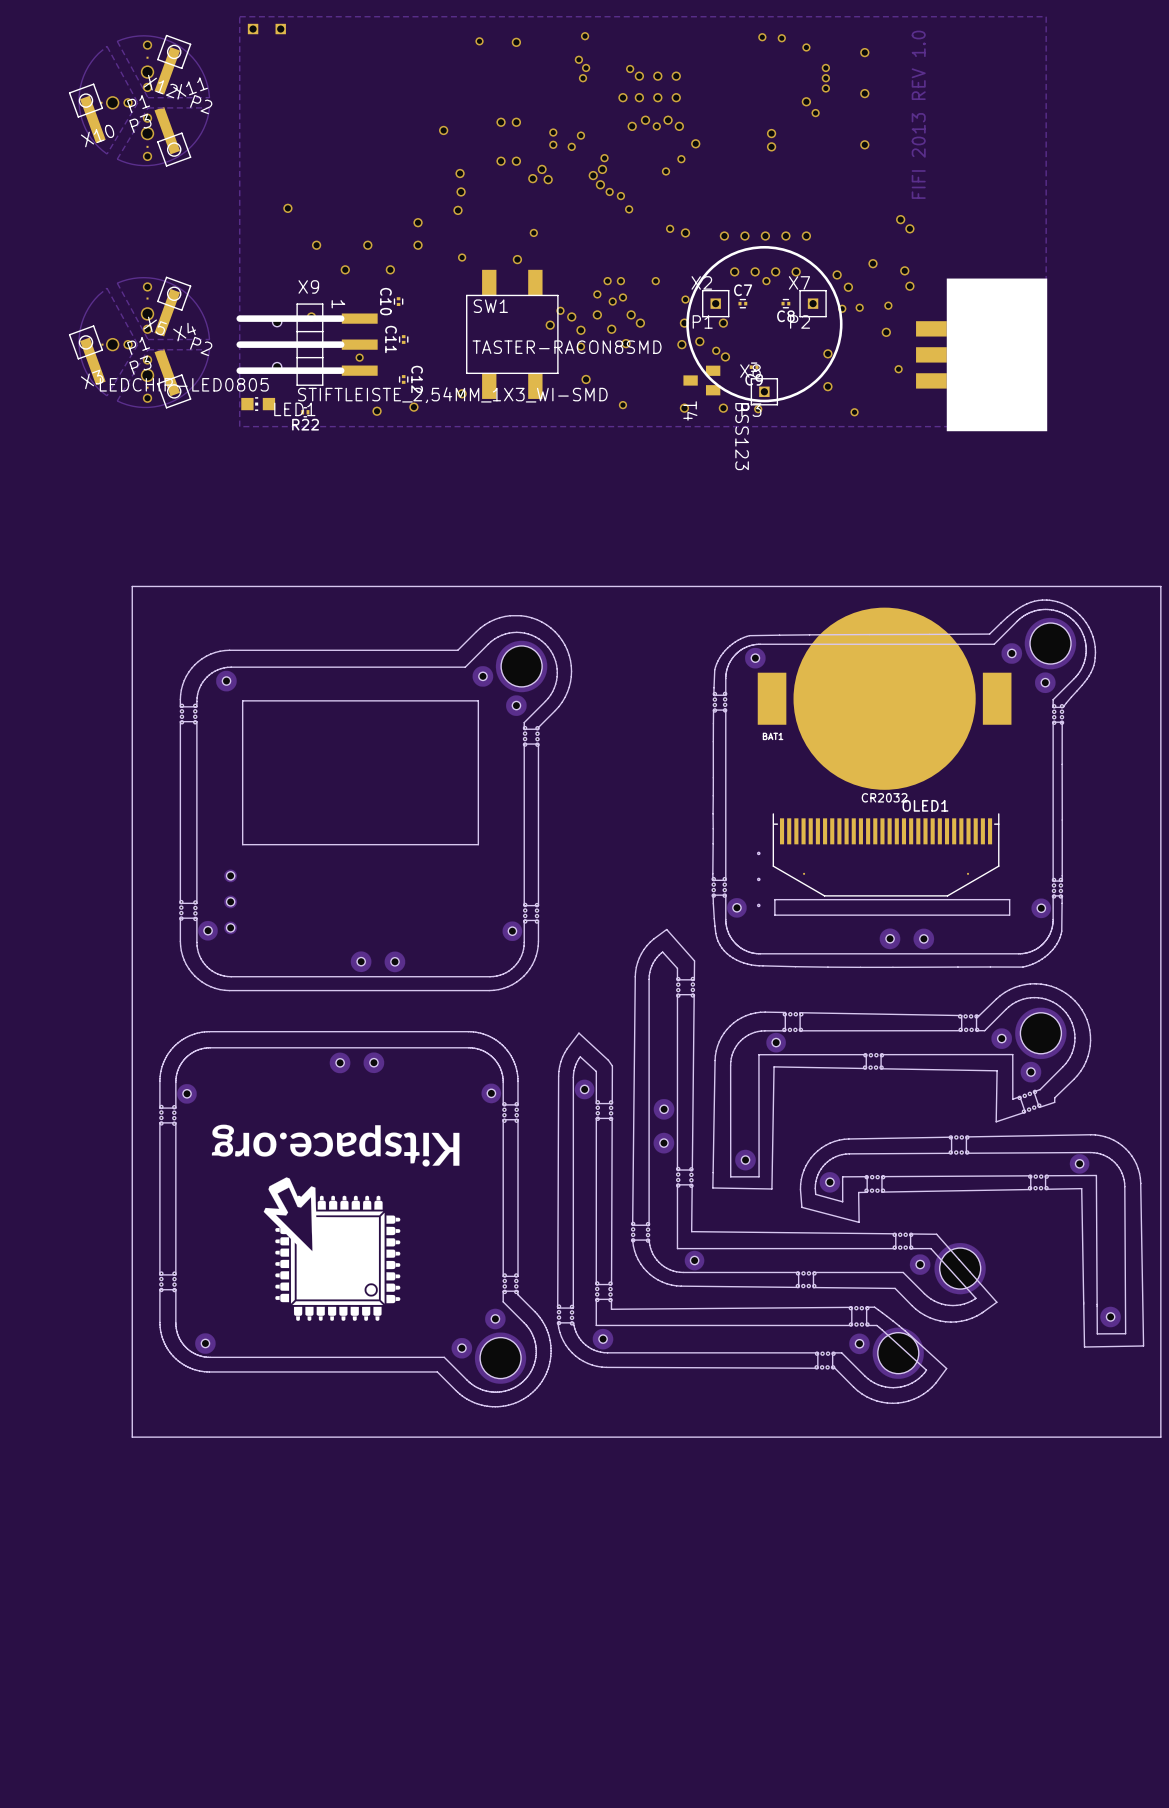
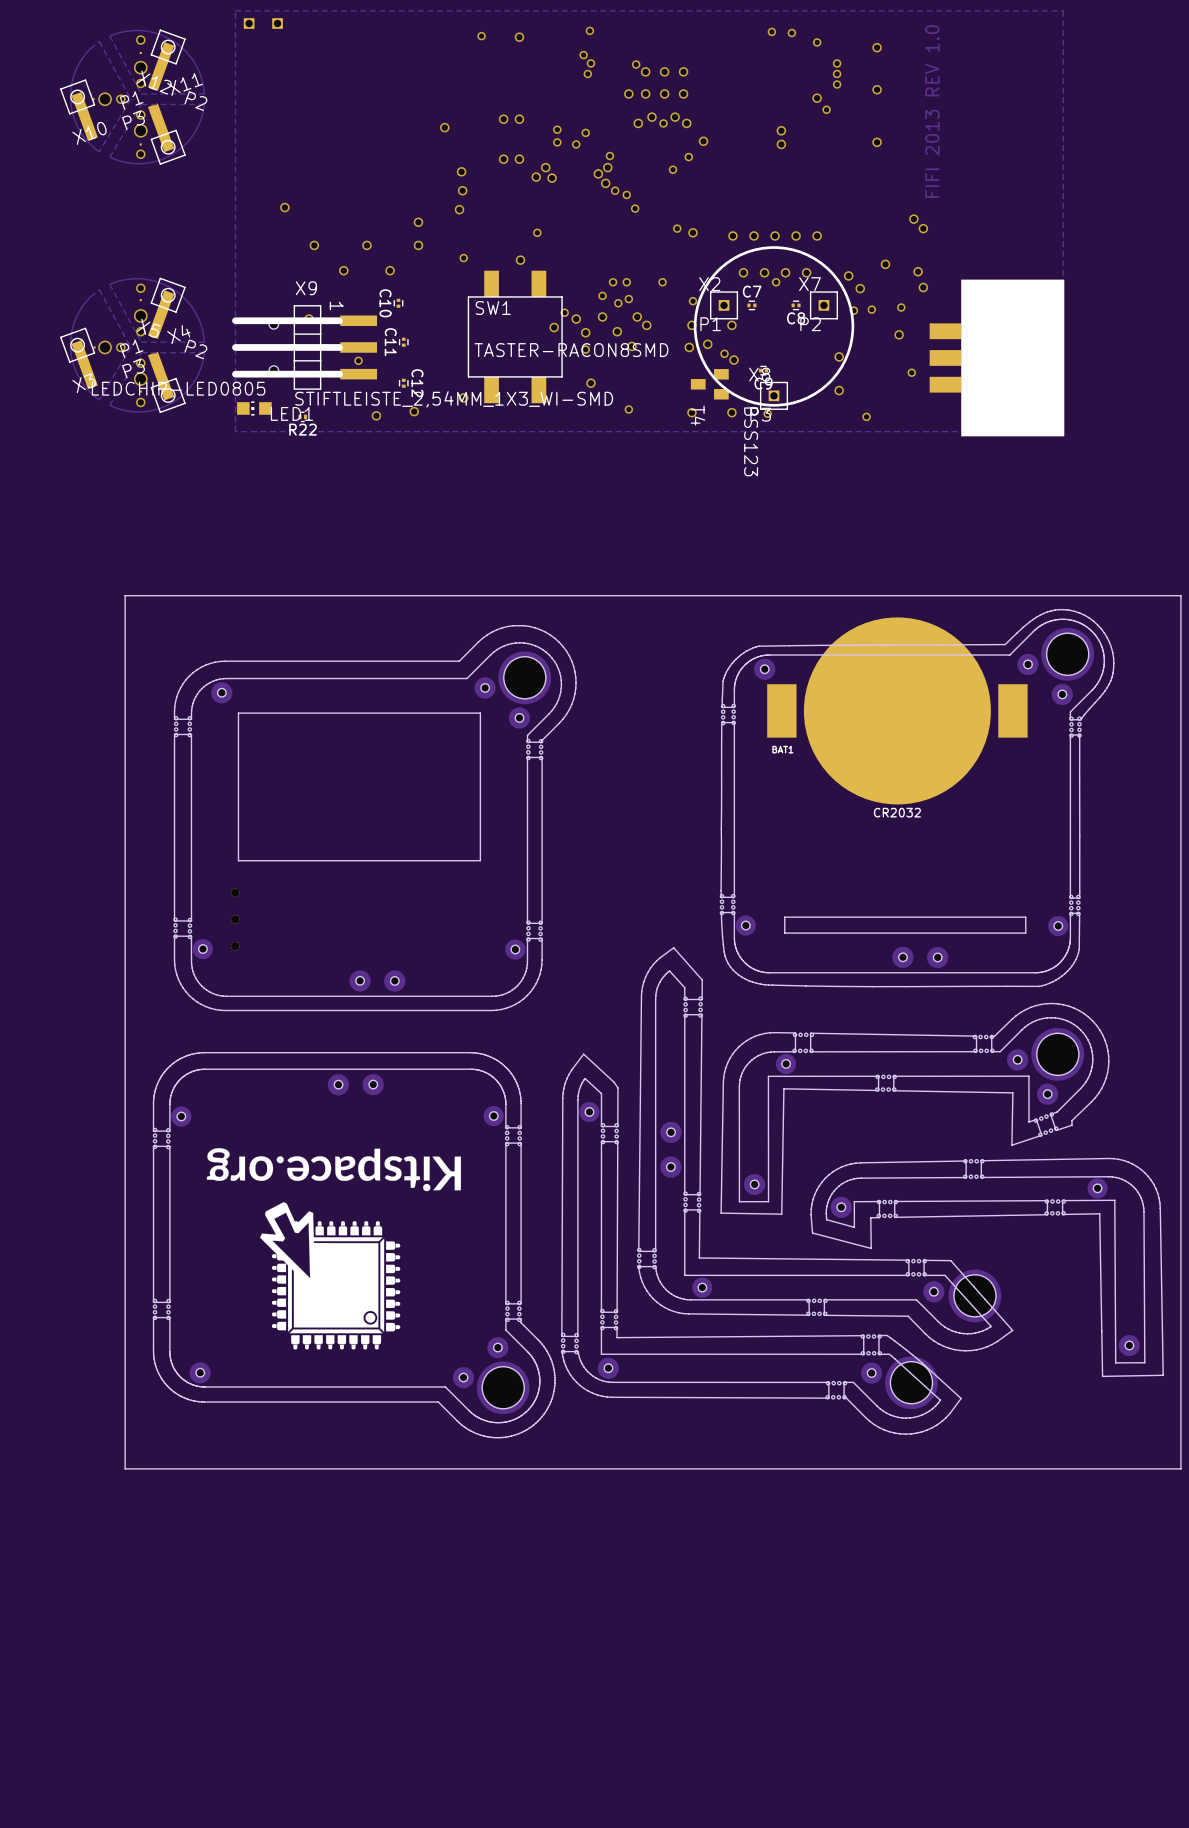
OLED1: (886, 854) -> none
part footprint: [224, 869, 237, 935] -> [231, 888, 240, 951]
part: (758, 879) -> none

